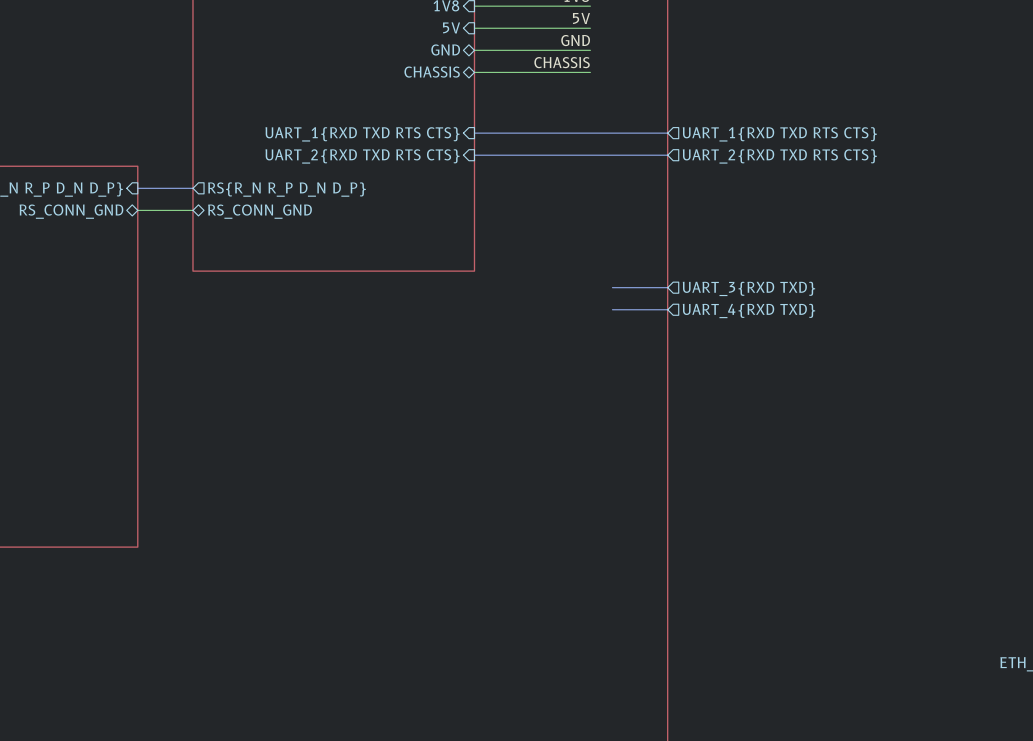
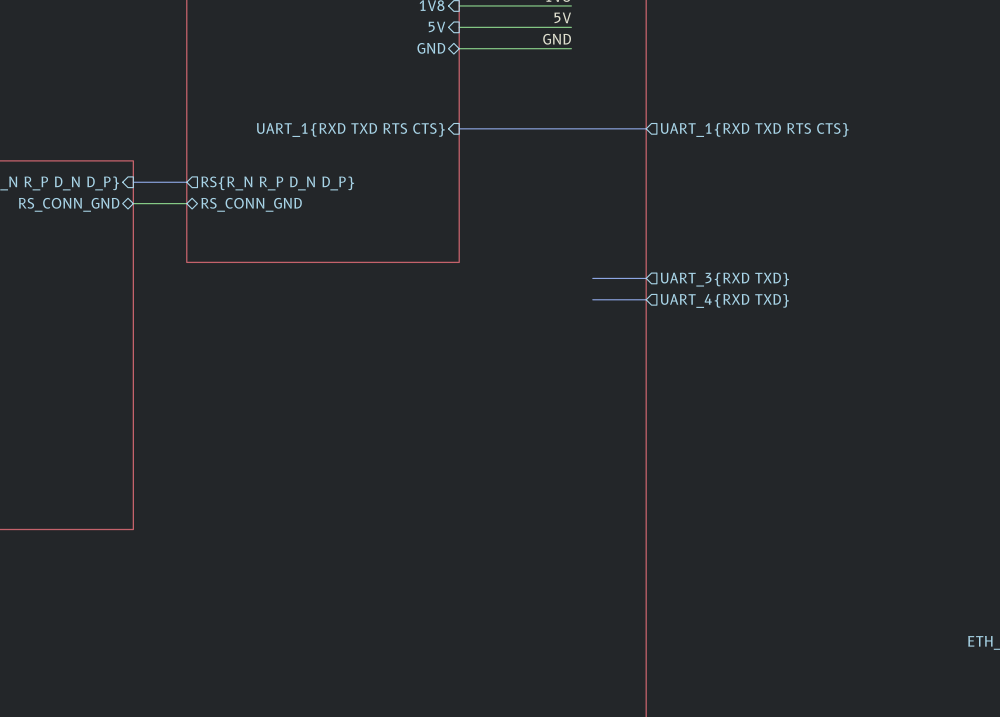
label: CHASSIS (562, 62) -> none
sheet pin: CHASSIS (432, 72) -> none
wire: (474, 72) (590, 72) -> none
bus: (474, 155) (667, 155) -> none
sheet pin: UART_2{RXD TXD RTS CTS} (362, 156) -> none
sheet pin: UART_2{RXD TXD RTS CTS} (779, 156) -> none

